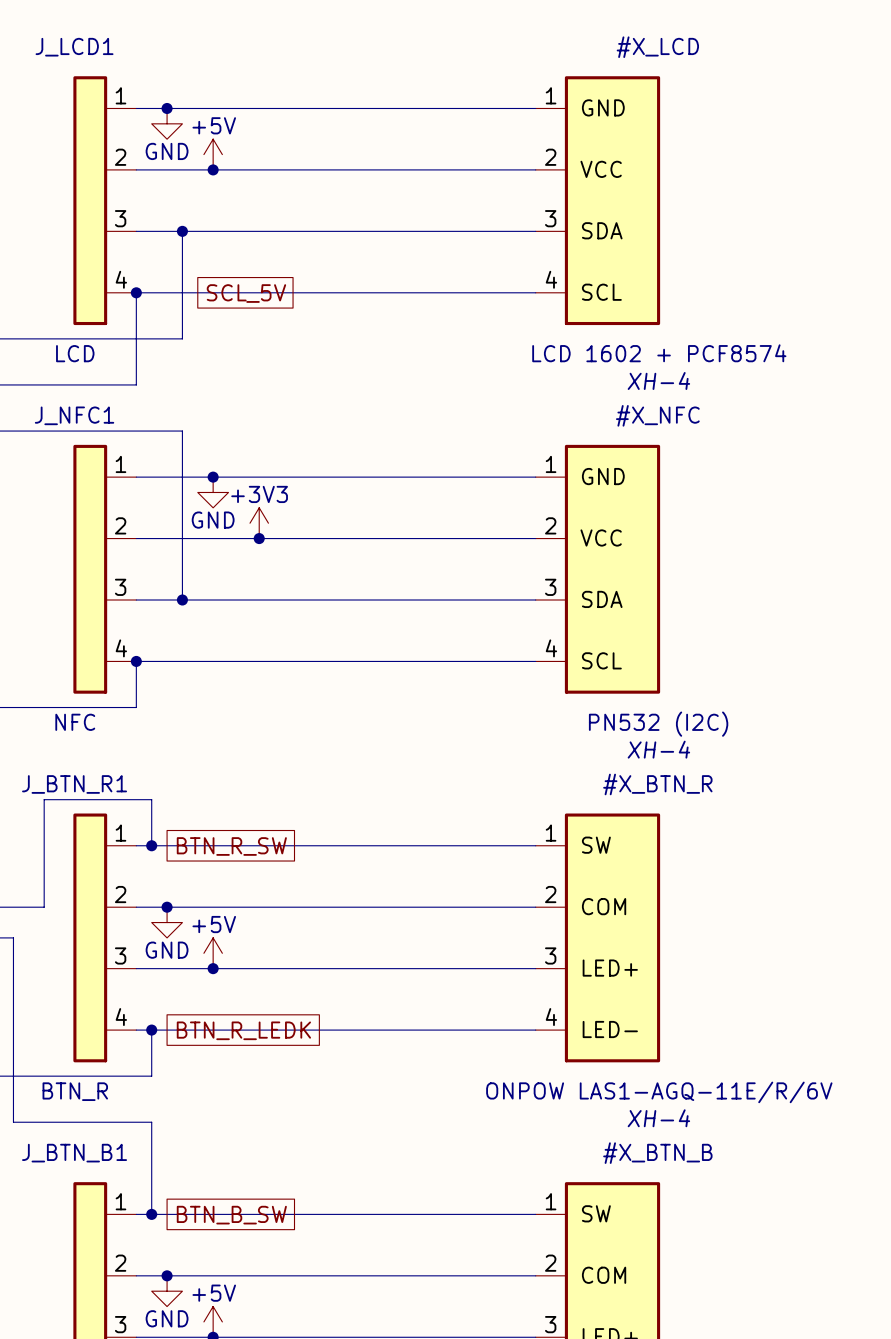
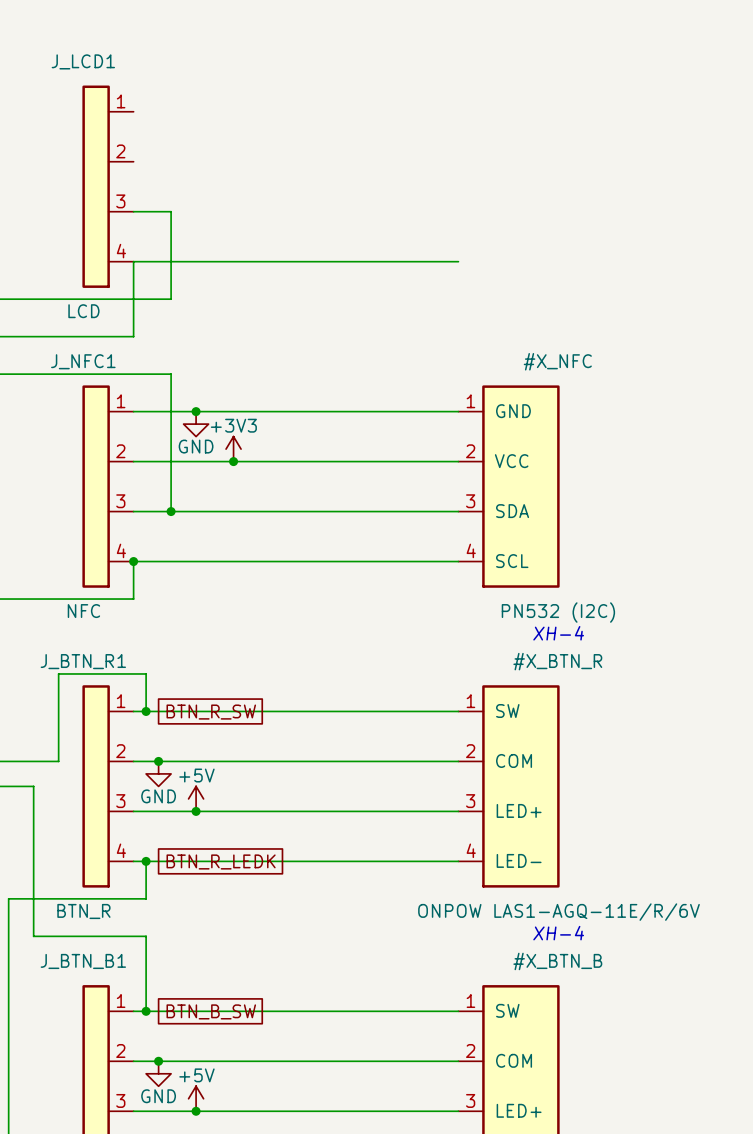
wire: (136, 108) (535, 108) -> none
junction: (167, 108) -> none
power symbol: GND (167, 123) -> none
power symbol: +5V (213, 154) -> none
wire: (136, 169) (535, 169) -> none
junction: (213, 169) -> none
#X_LCD: LCD 1602 + PCF8574 (597, 200) -> none
wire: (182, 231) (535, 231) -> none
junction: (182, 231) -> none
junction: (136, 292) -> none
global label: SCL_5V (246, 293) -> none
text: XH-4 (658, 381) -> none

